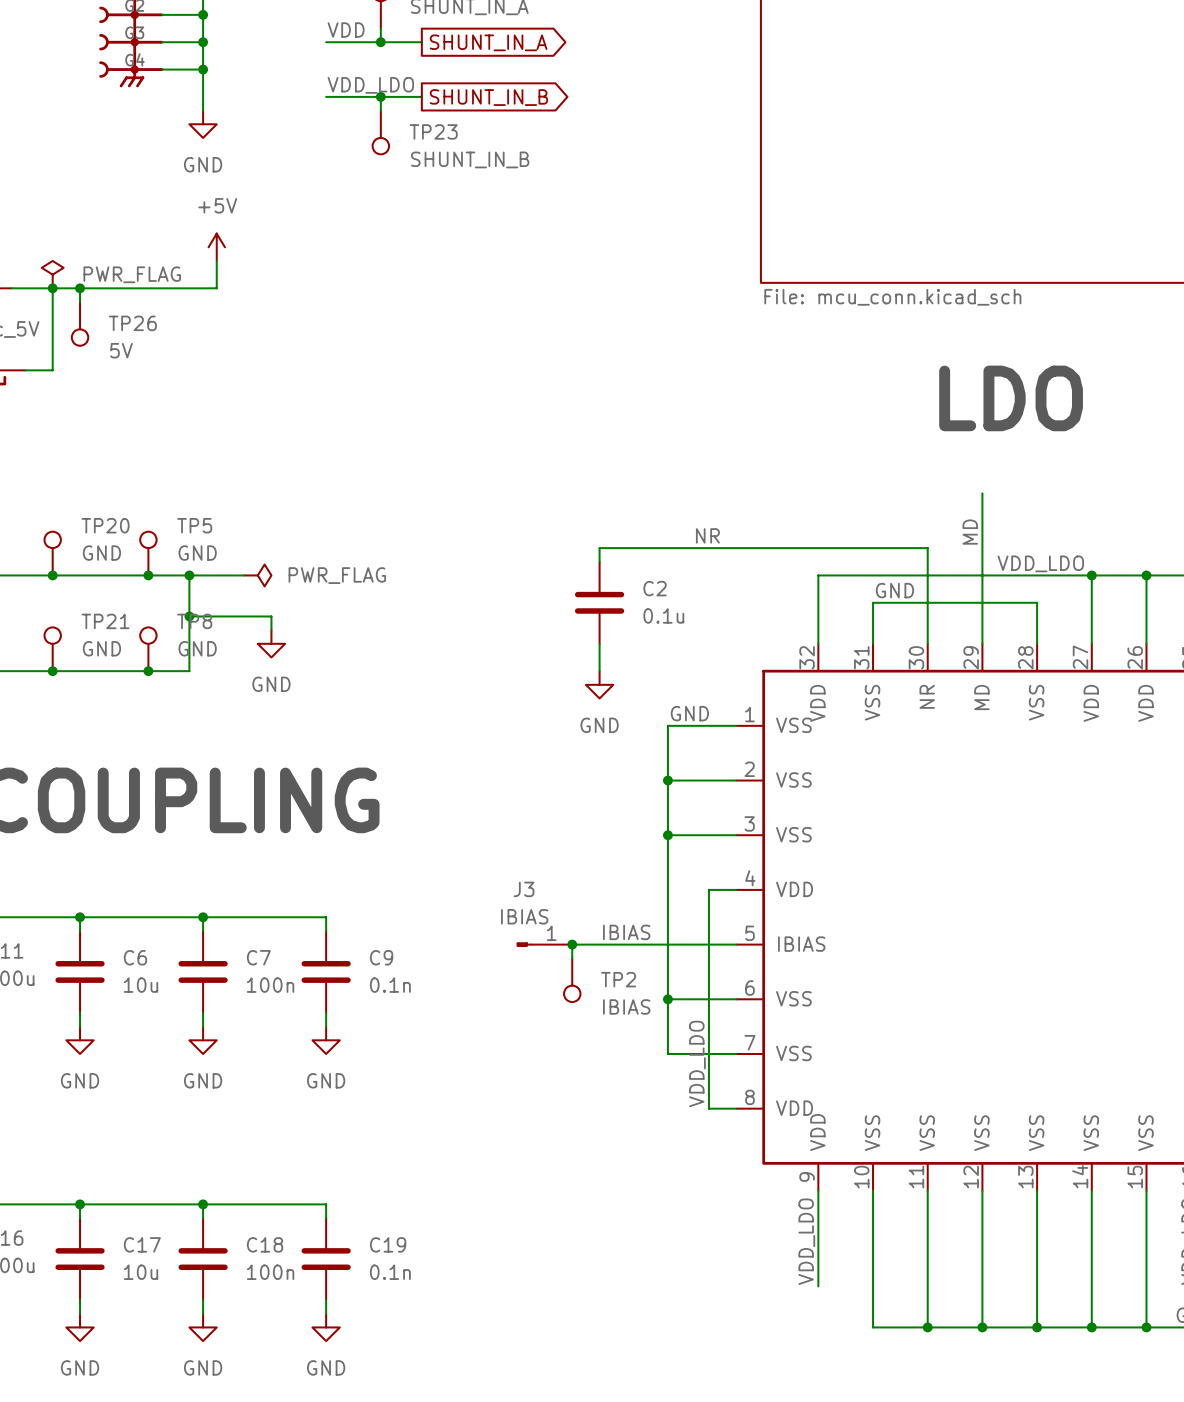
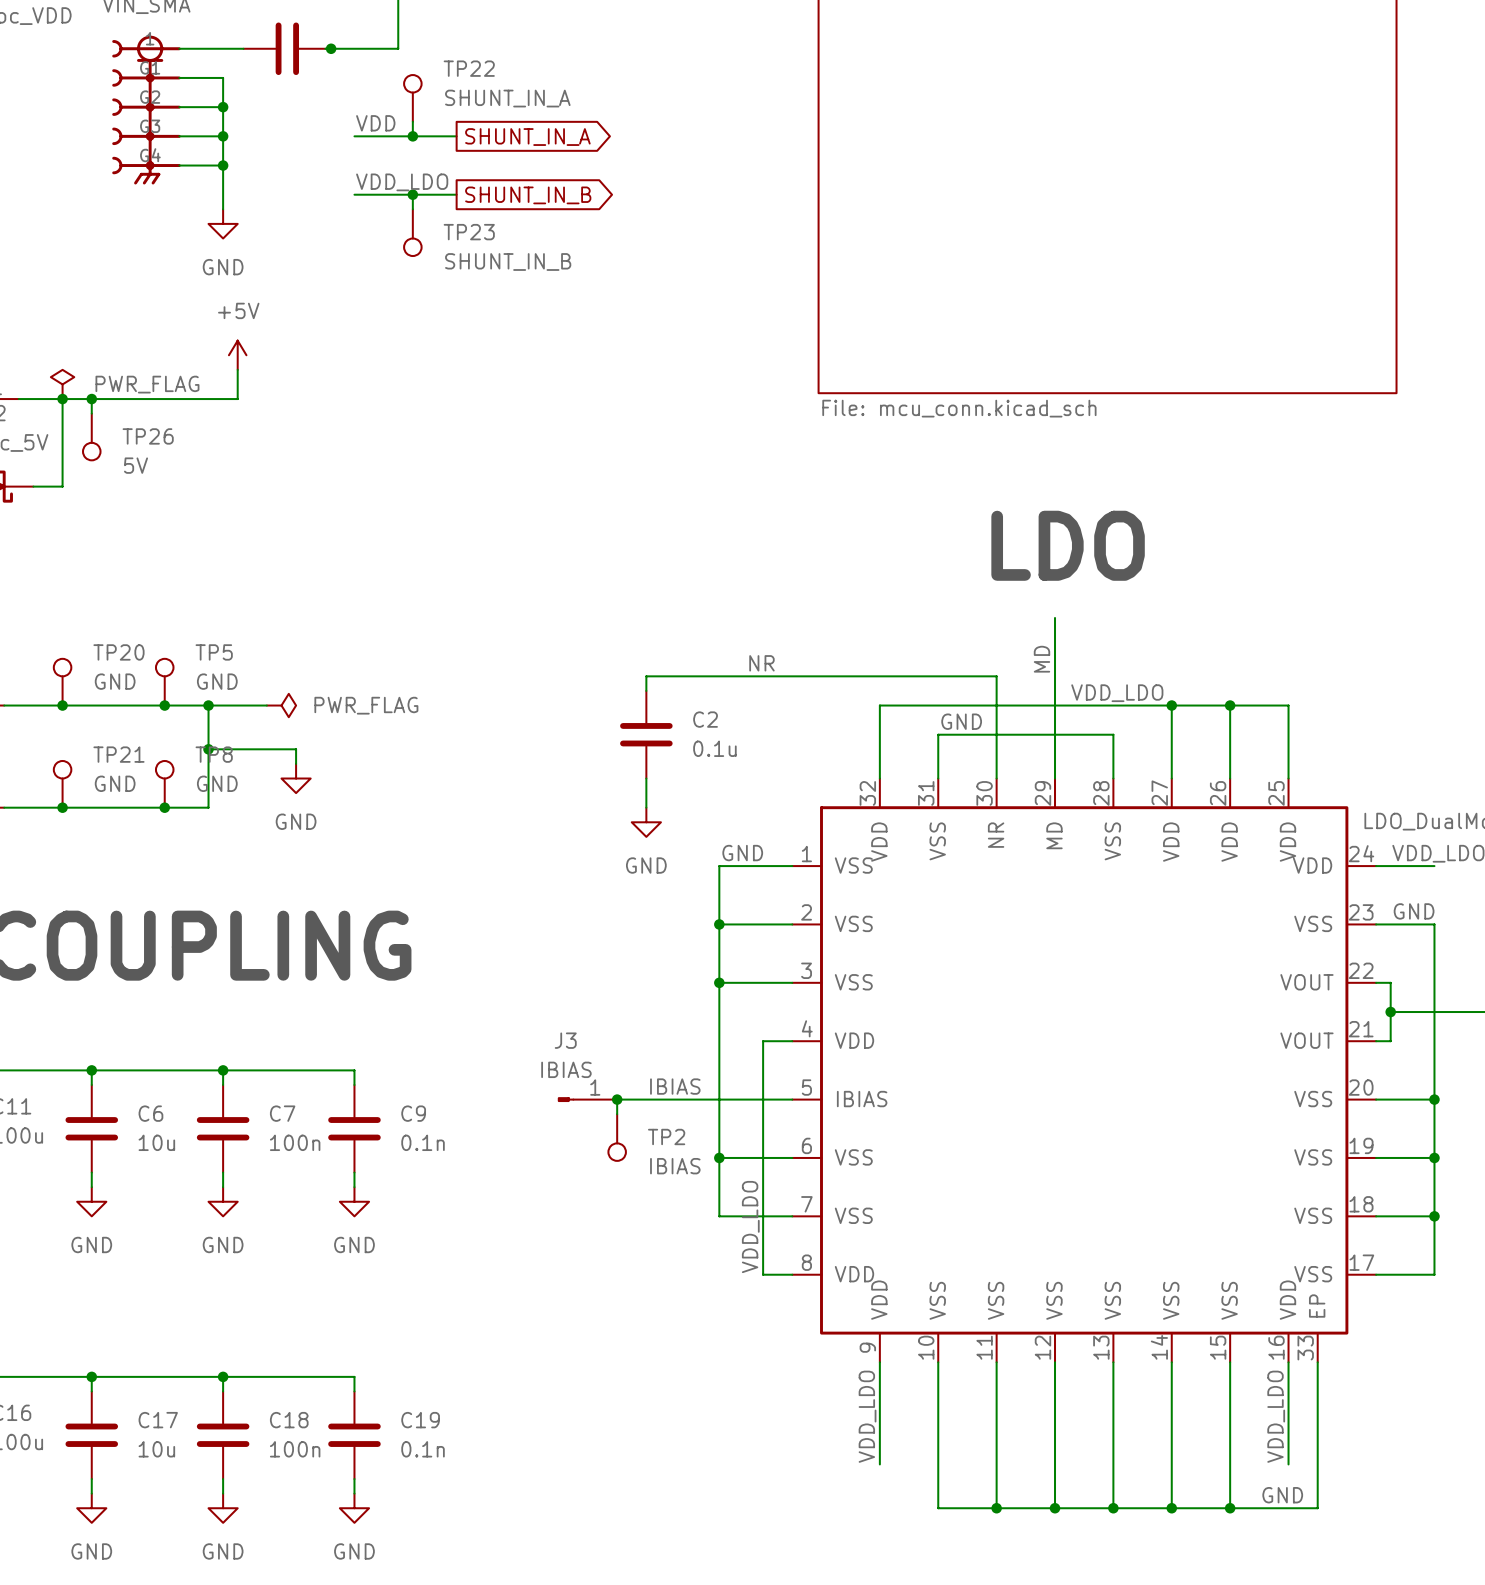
text position: LDO (1011, 398) -> LDO (1068, 545)

